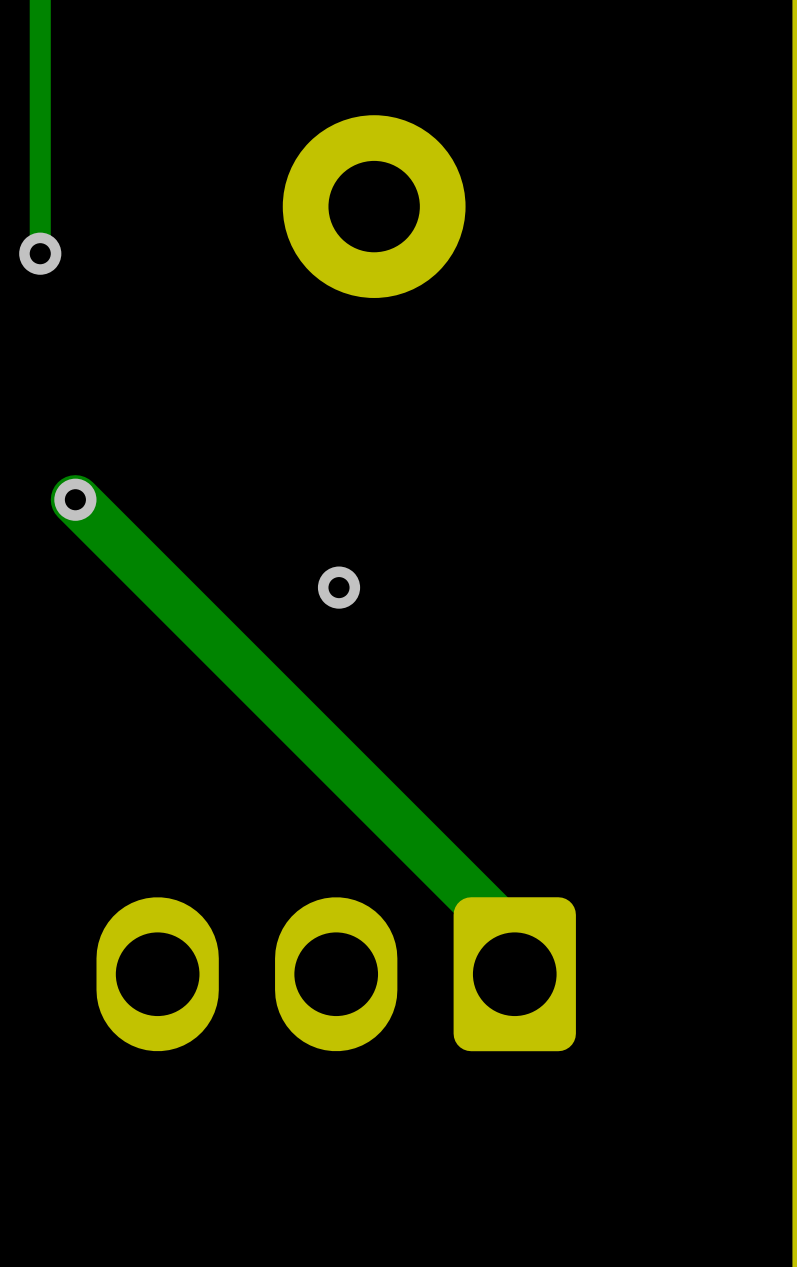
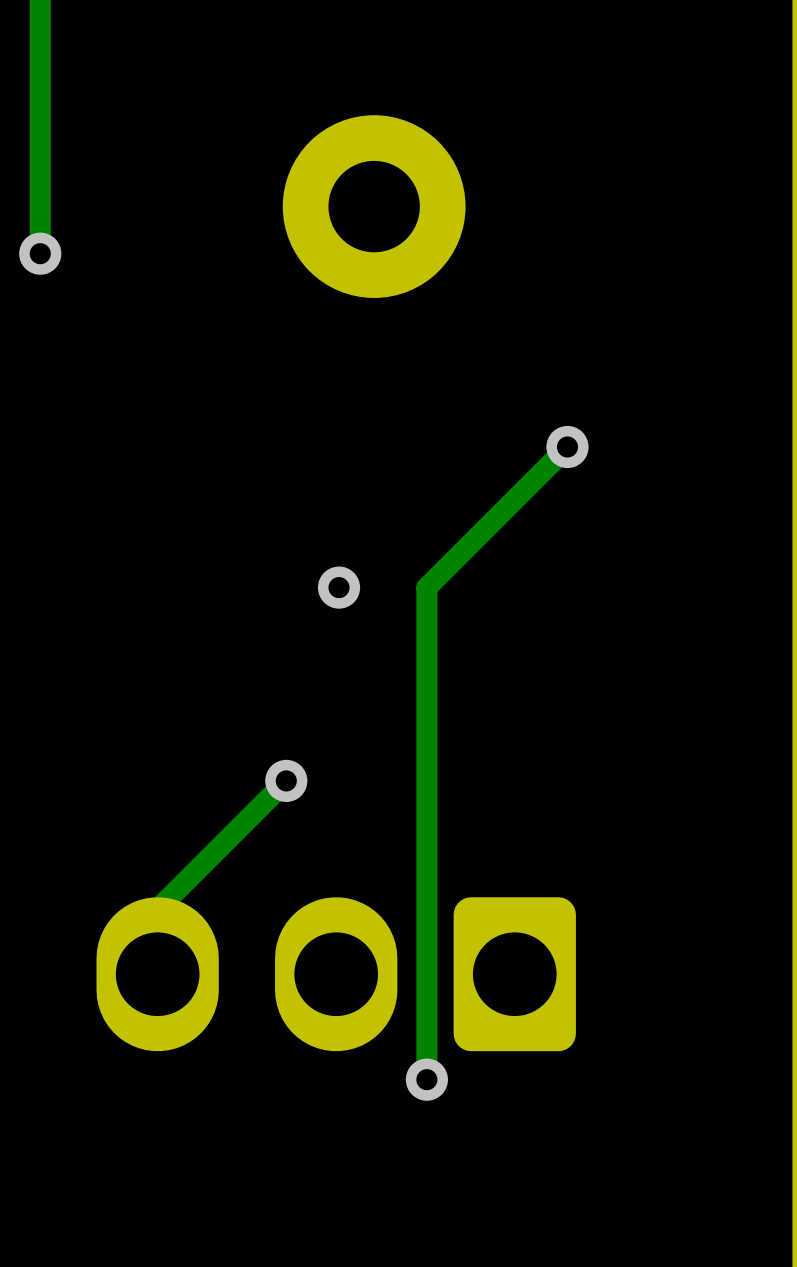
track: none -> (567, 447) (426, 587) (426, 1079)
via: none -> (567, 447)
track: (75, 499) (497, 921) (497, 956) (514, 974) -> none
via: (75, 499) -> none
track: none -> (286, 780) (163, 903) (163, 974)
via: none -> (286, 780)
via: none -> (426, 1079)

